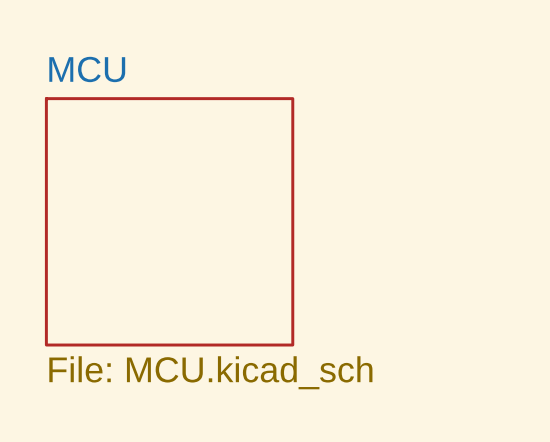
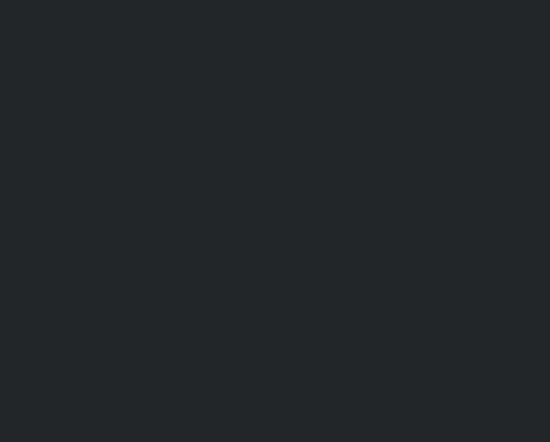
sheet MCU: File: MCU.kicad_sch (169, 221) -> none

